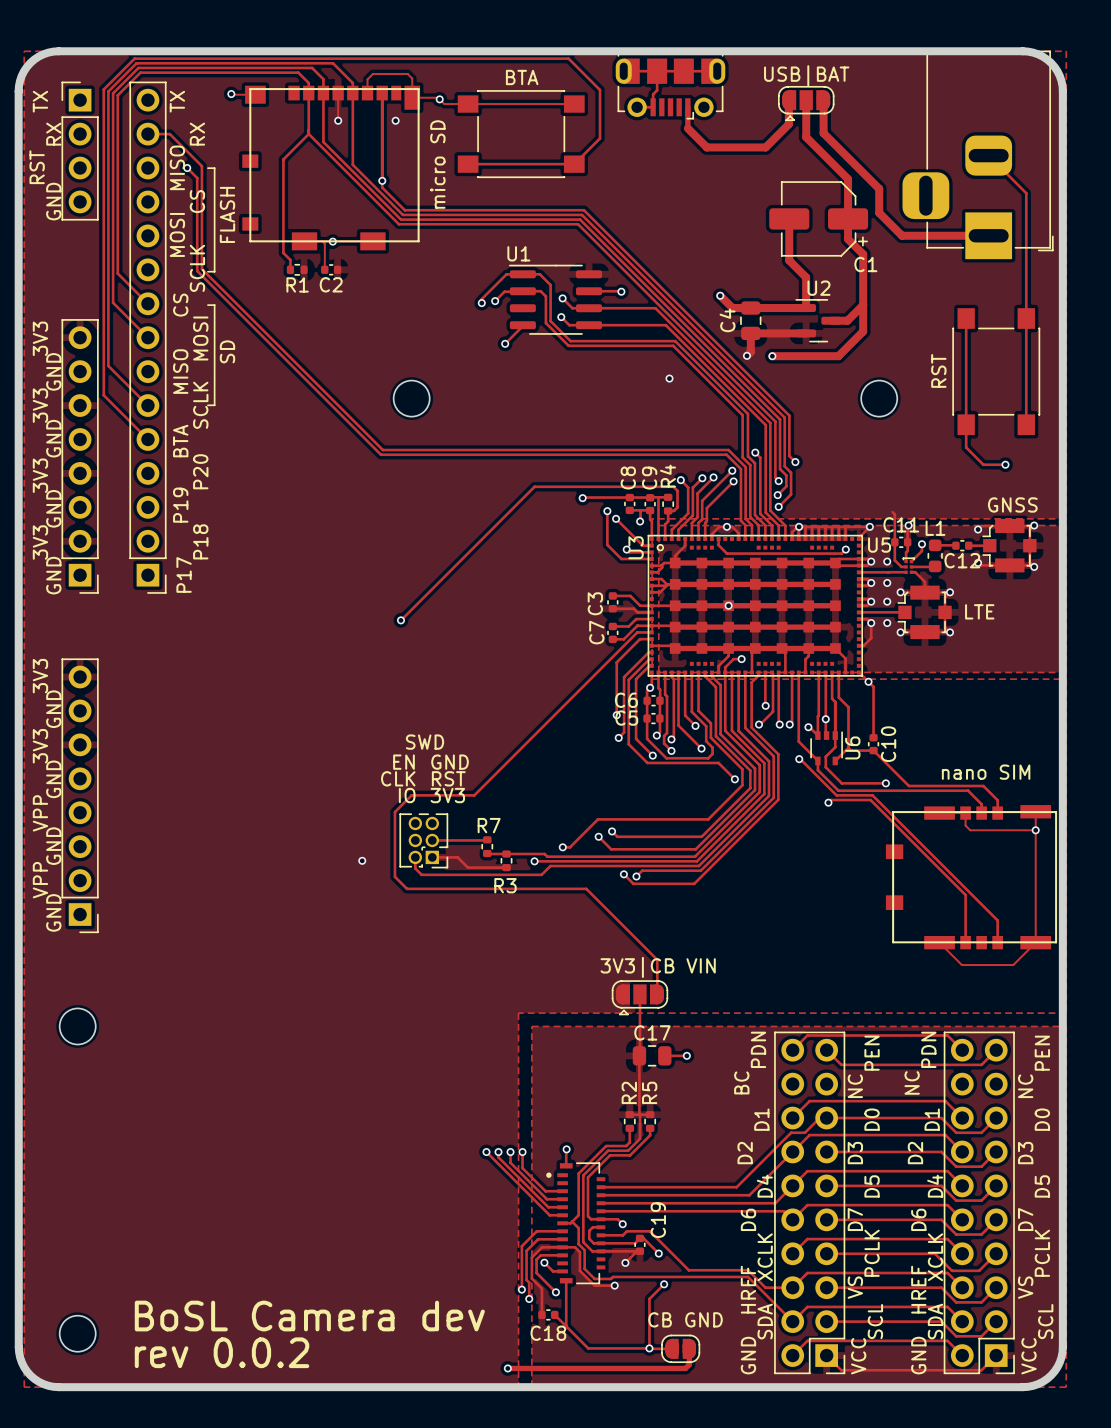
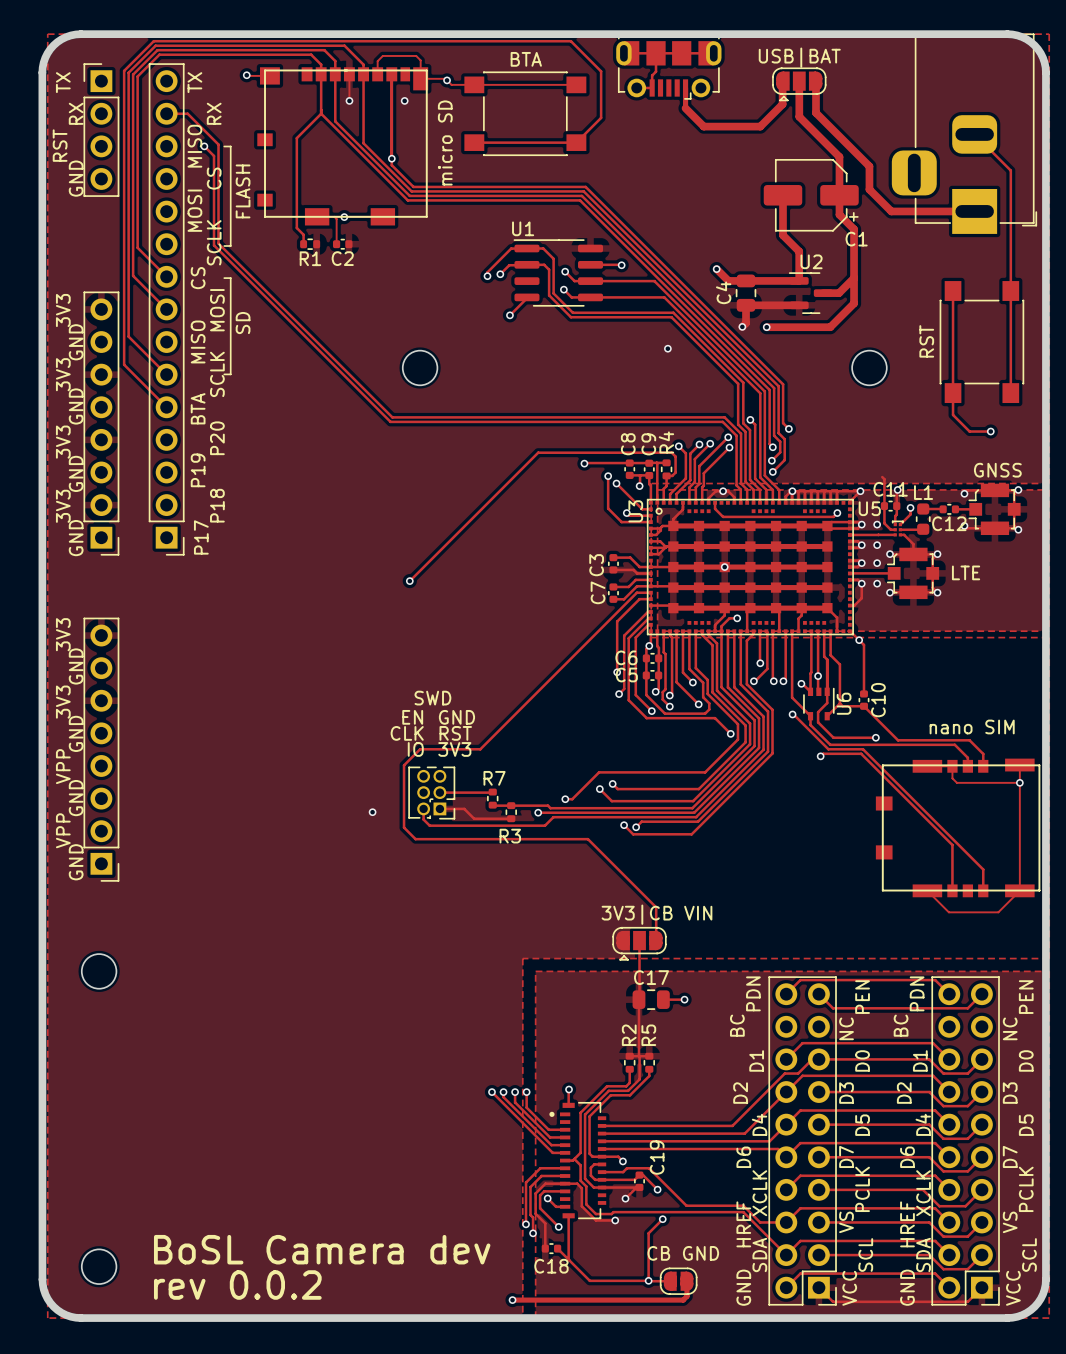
text: NC (912, 1082) -> BC (901, 1025)

